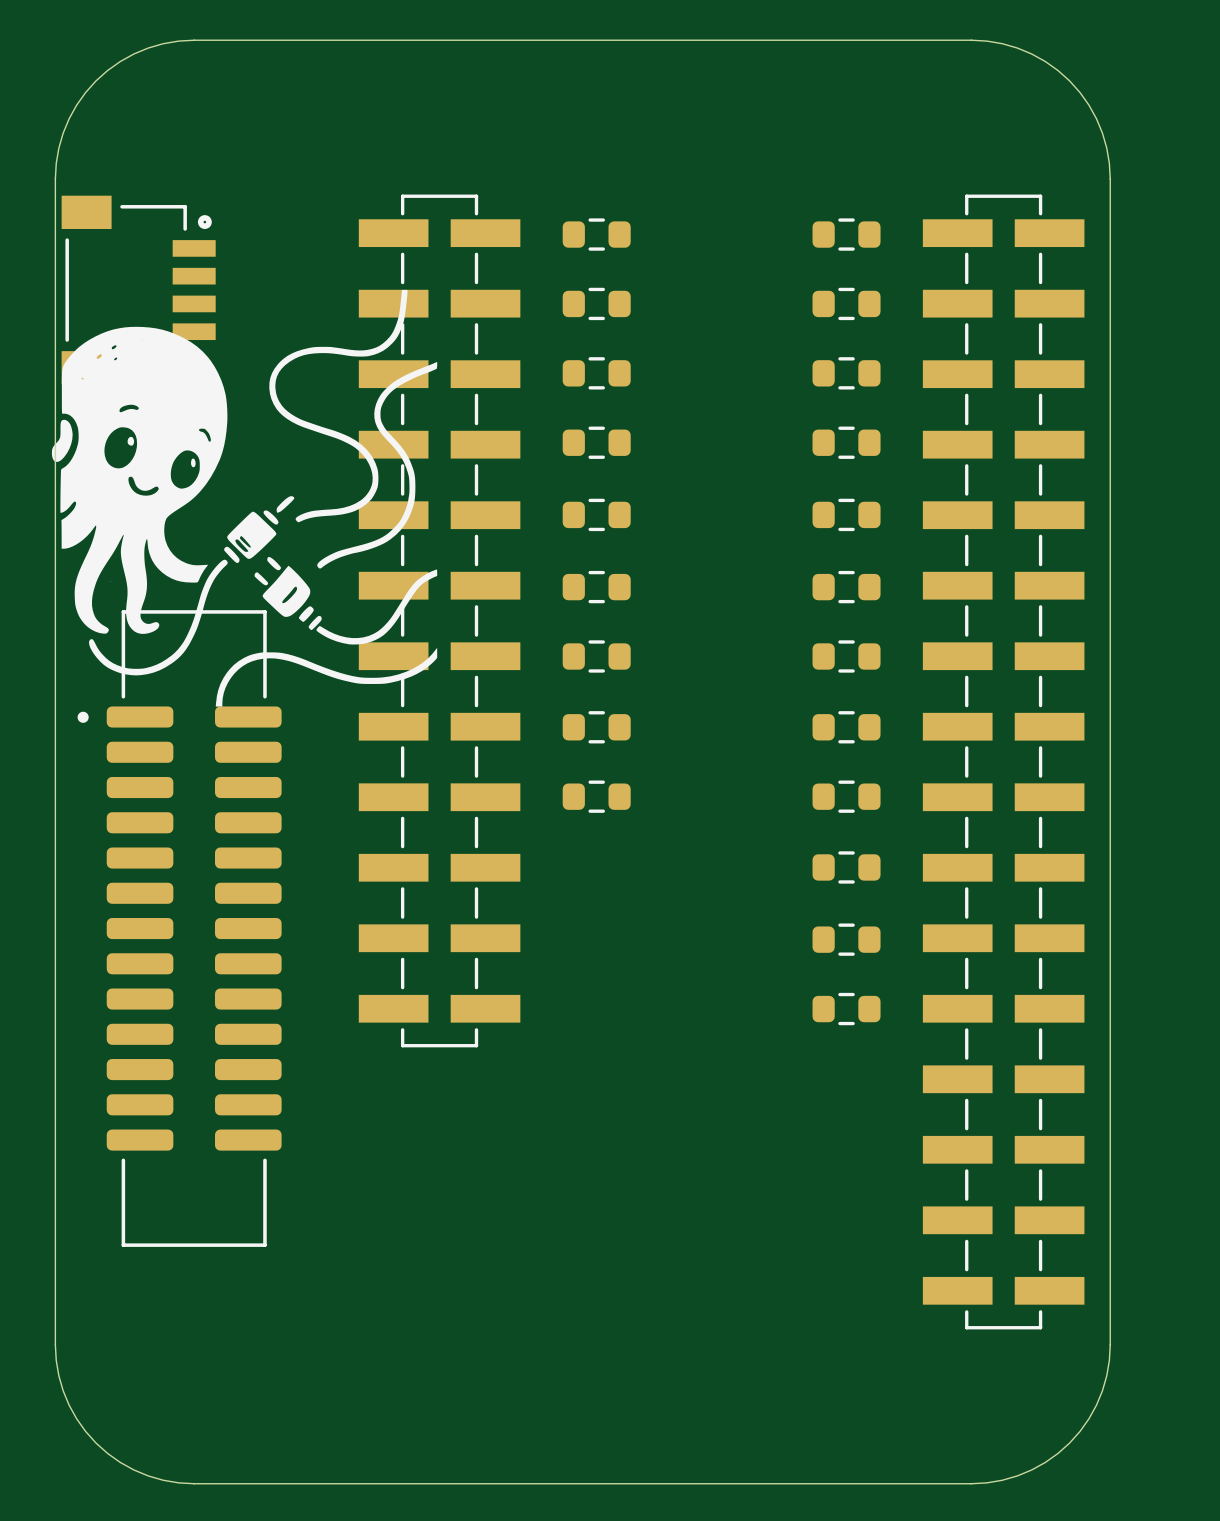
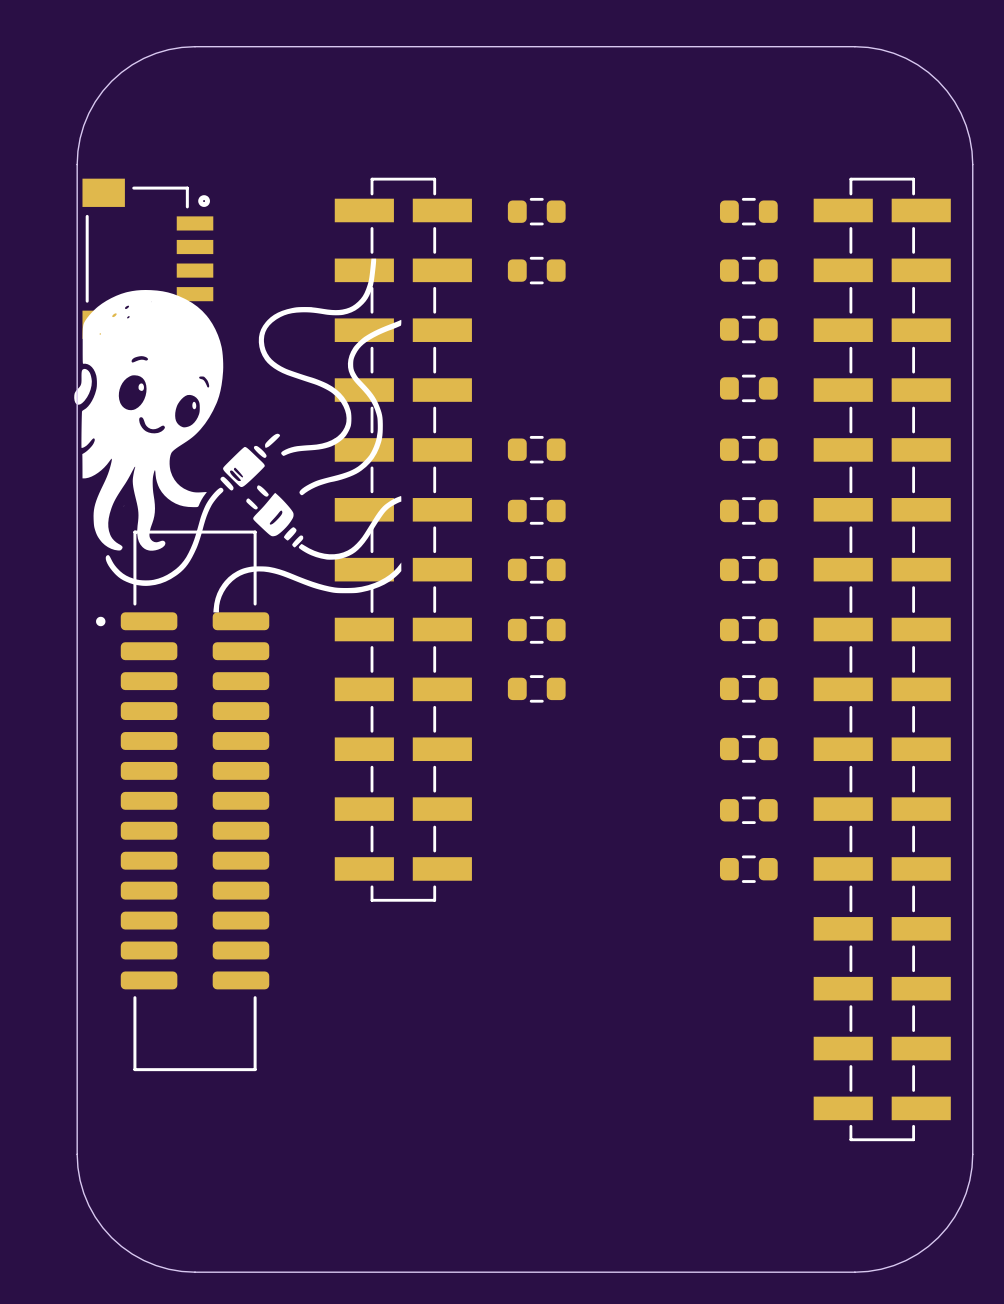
part: (596, 373) -> none
part: (596, 442) -> none

